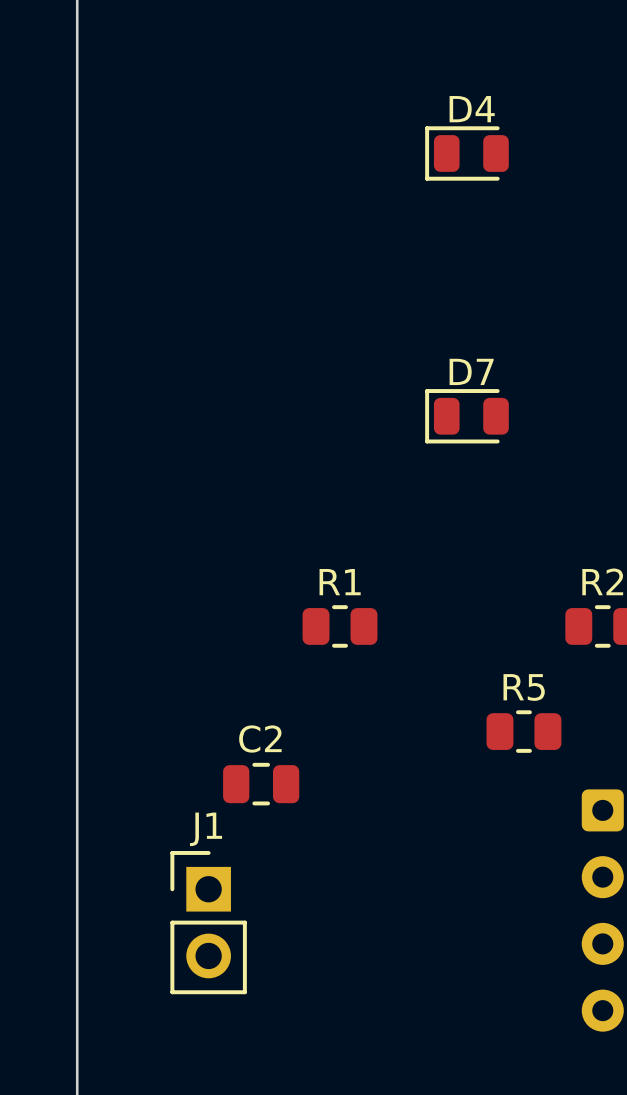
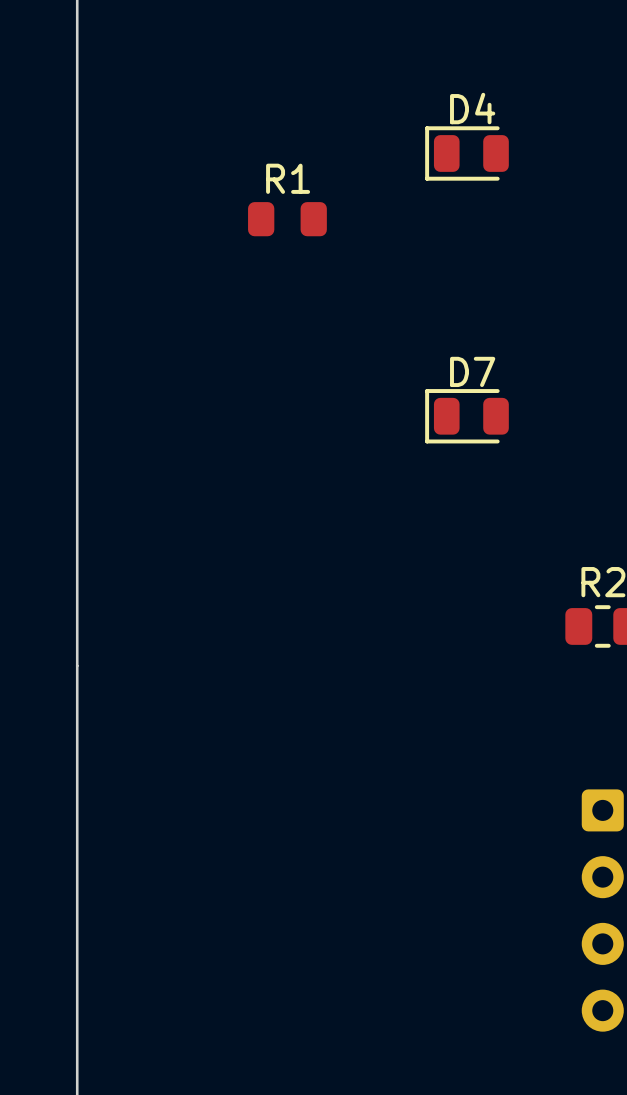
R1 footprint: [302, 605, 378, 648] -> [248, 202, 327, 237]
R5: (523, 731) -> none
C2: (261, 784) -> none
J1: (208, 922) -> none

